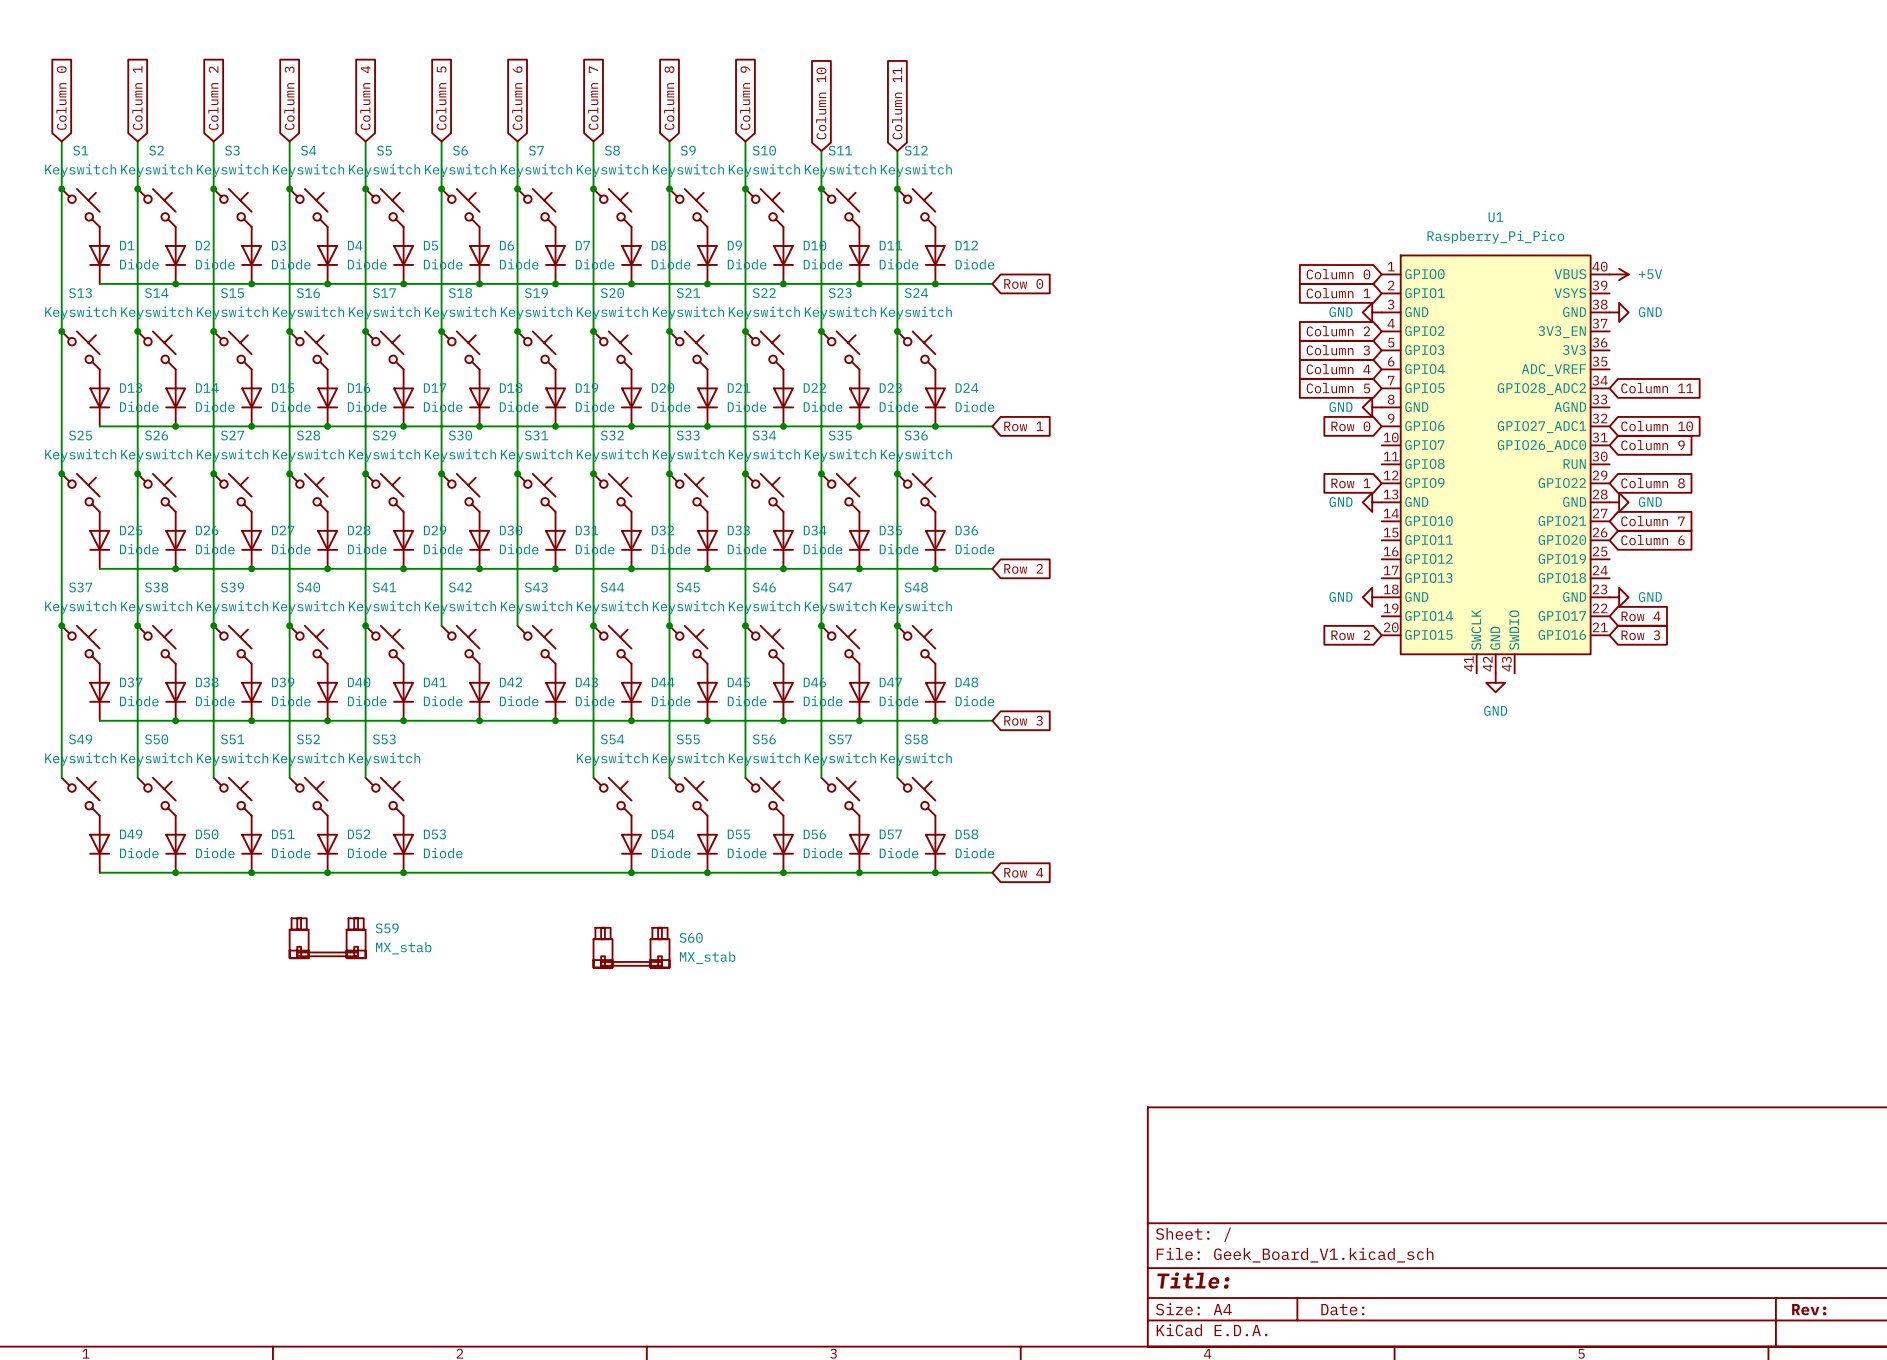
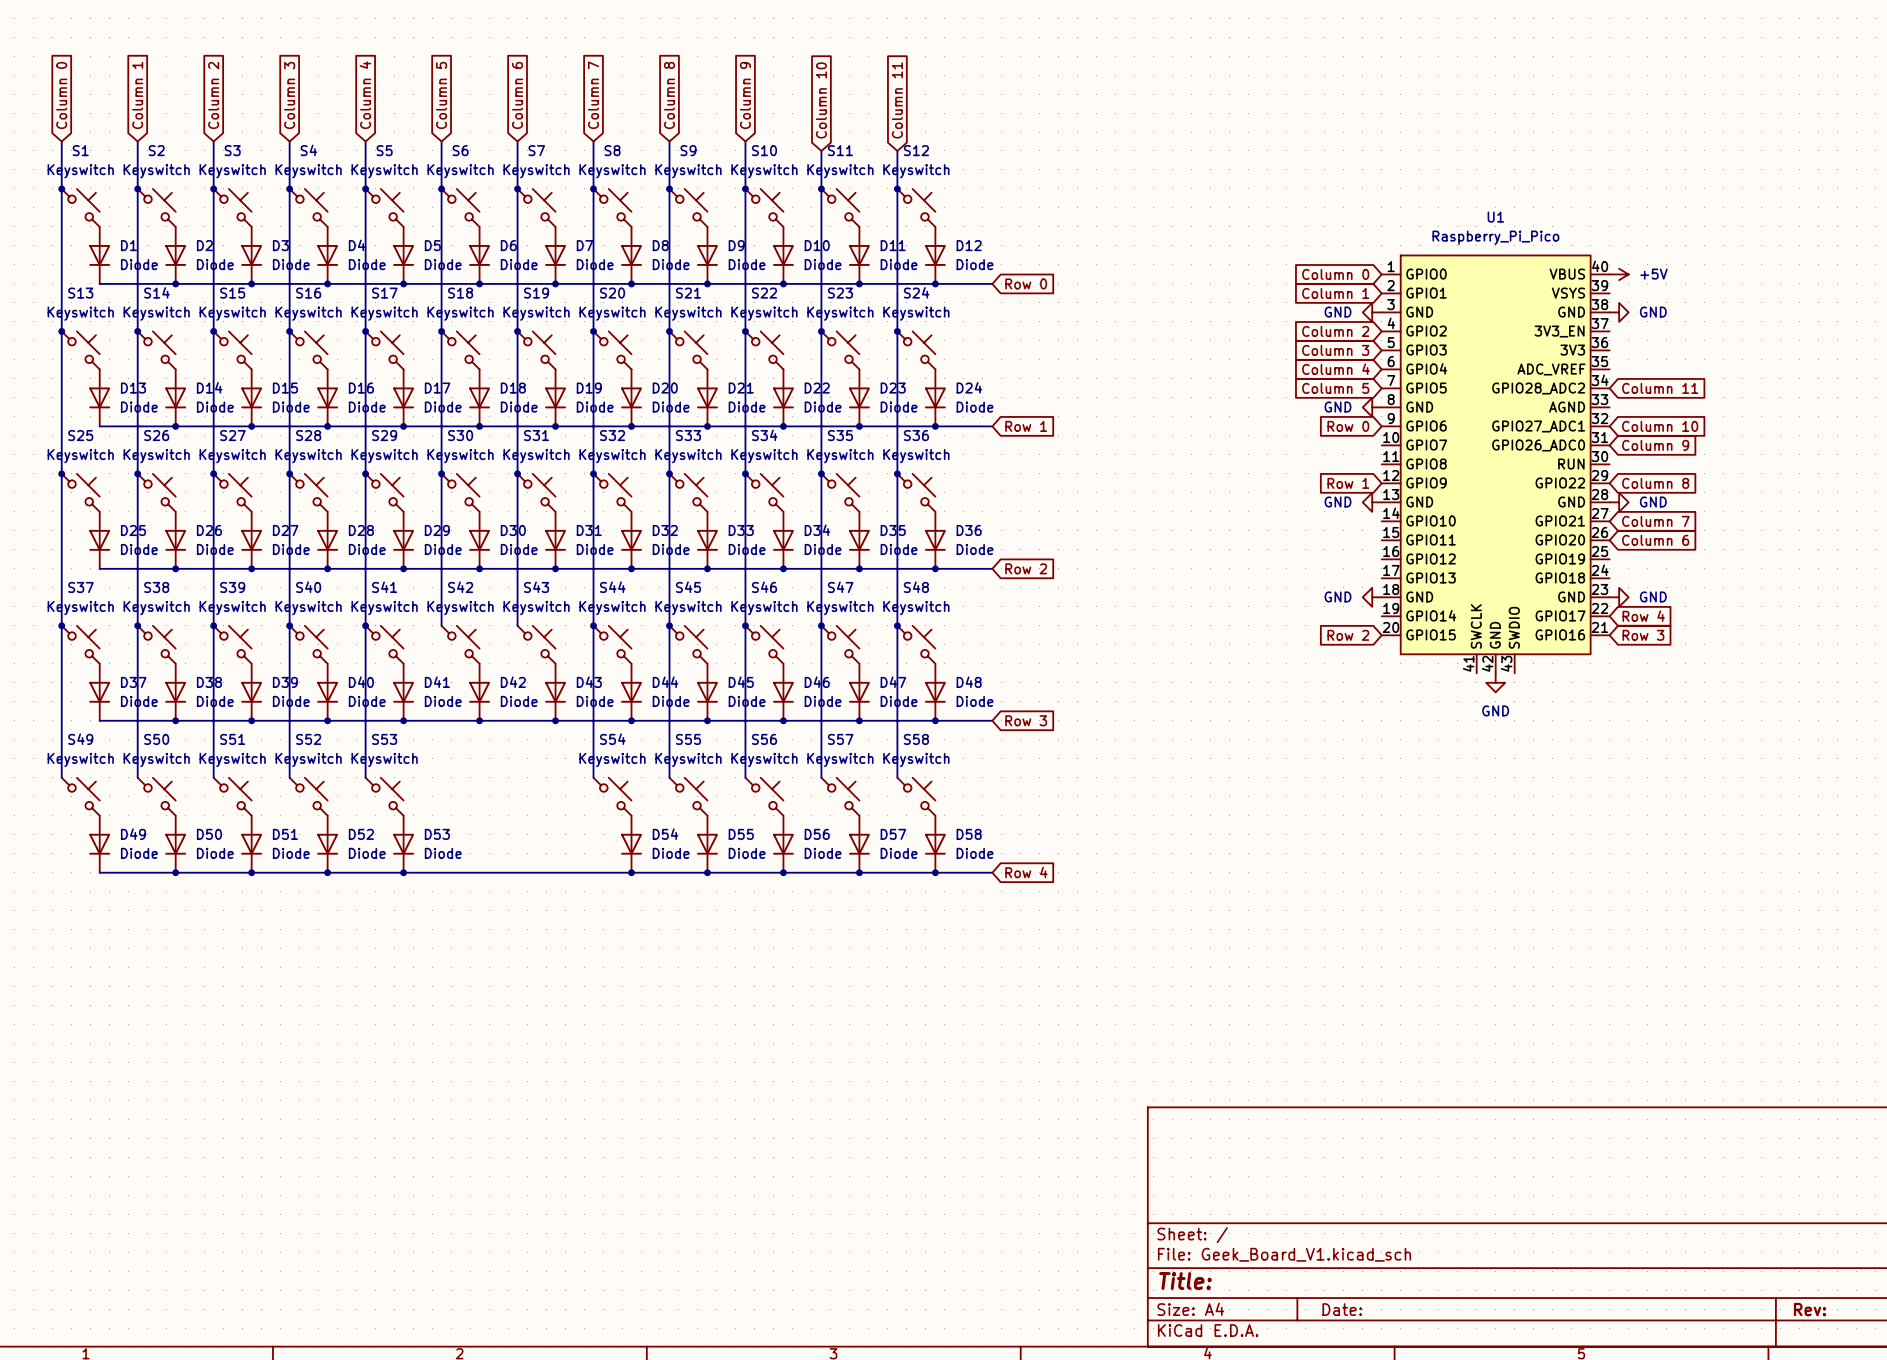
S59: MX_stab (327, 938) -> none
S60: MX_stab (631, 947) -> none

